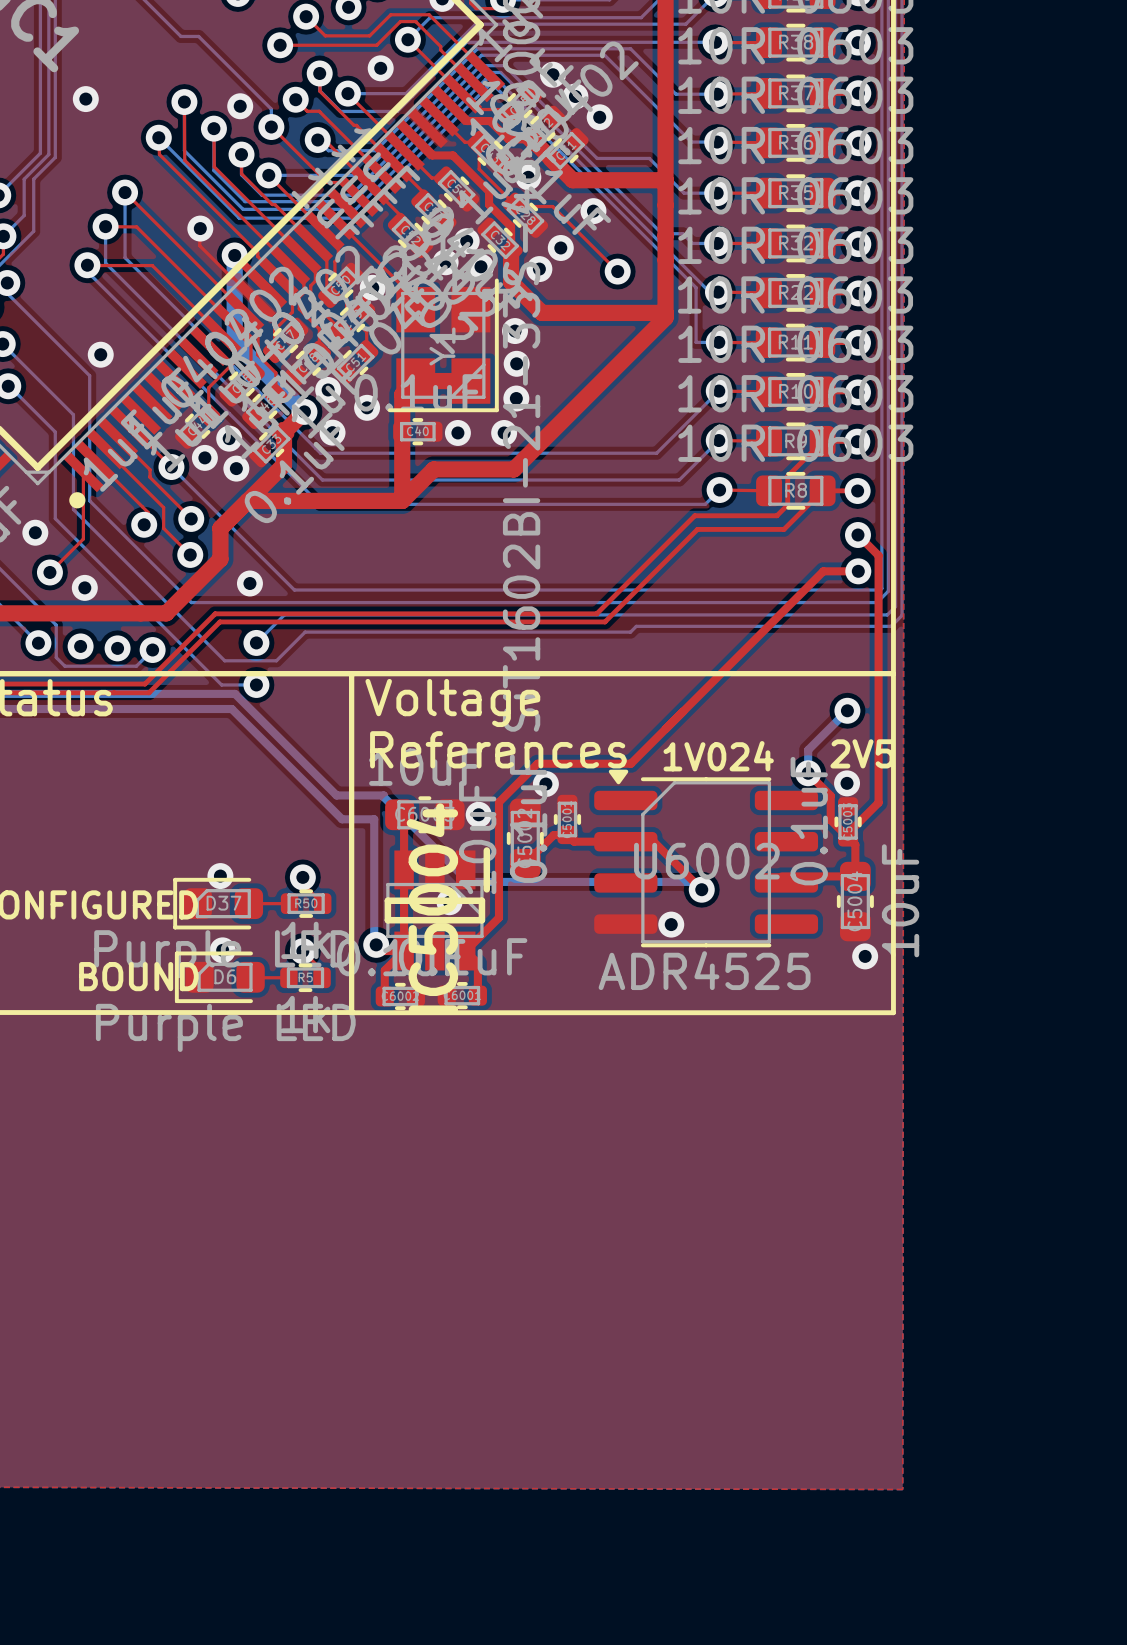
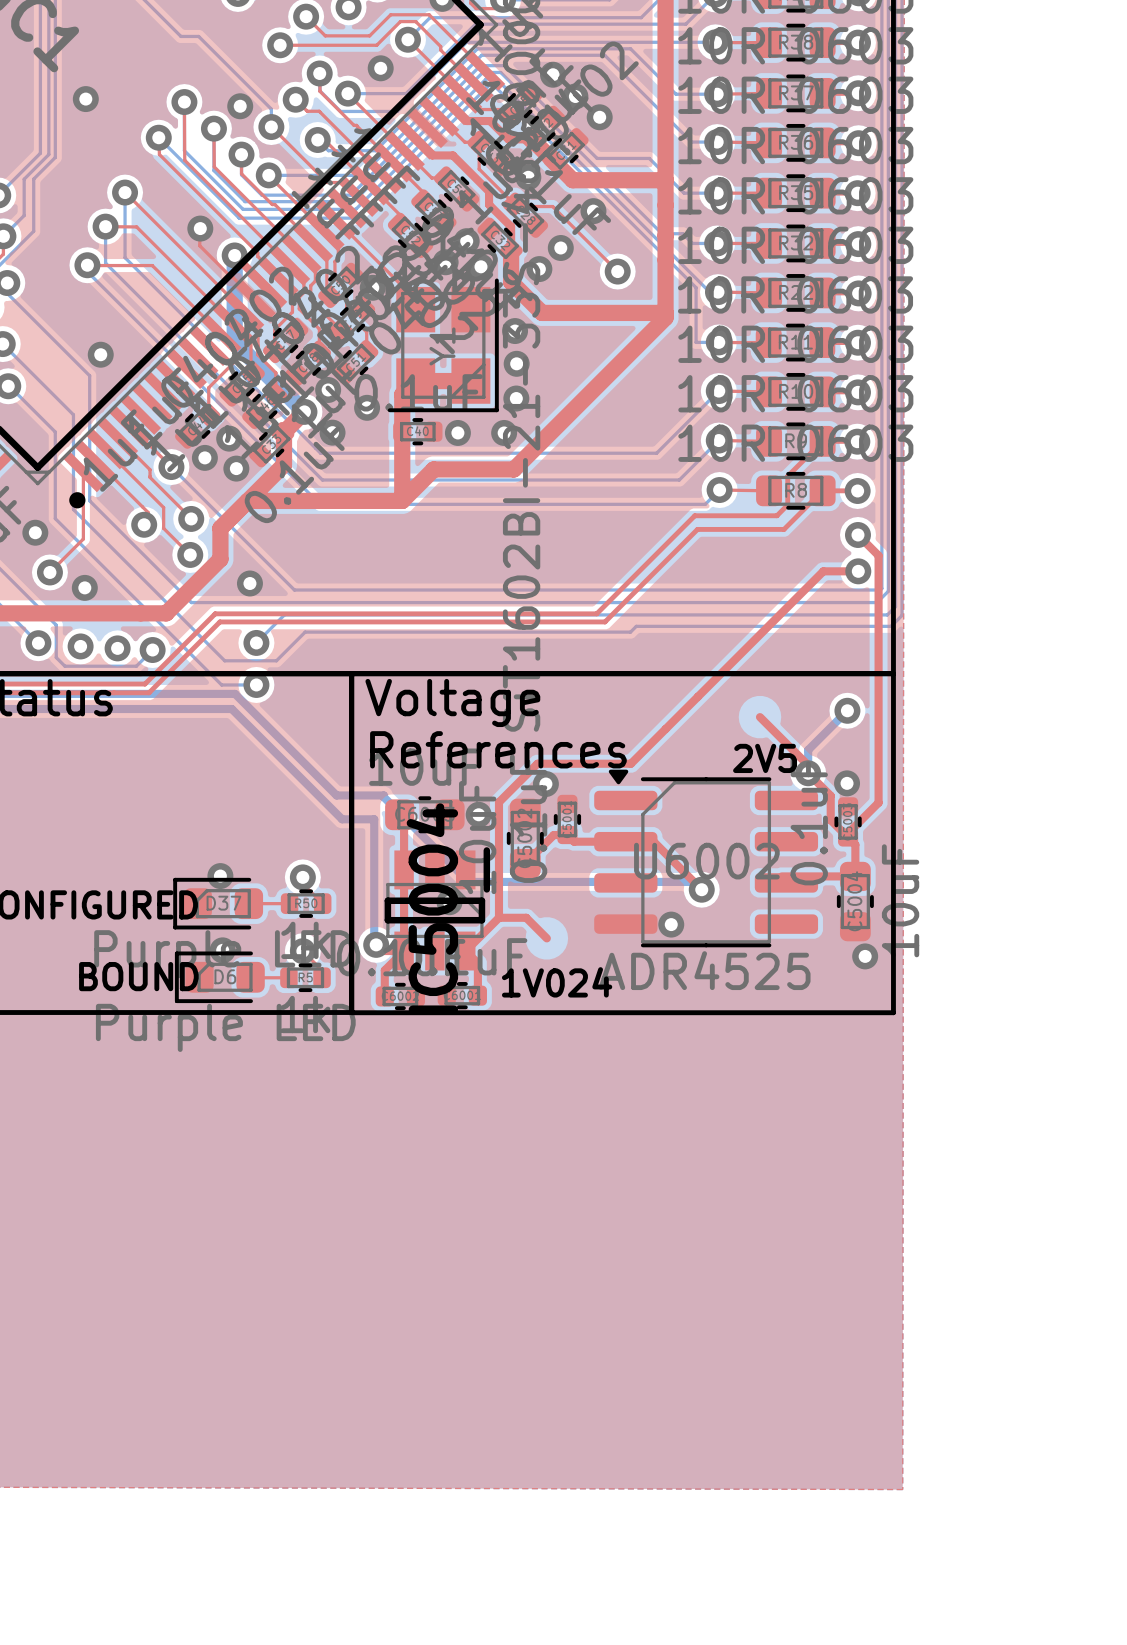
top track: none -> (759, 717) (808, 765) (808, 773)
text position: 2V5 (862, 753) -> 2V5 (765, 758)
text position: 1V024 (718, 756) -> 1V024 (557, 982)
top track: none -> (498, 917) (526, 917) (546, 938)

